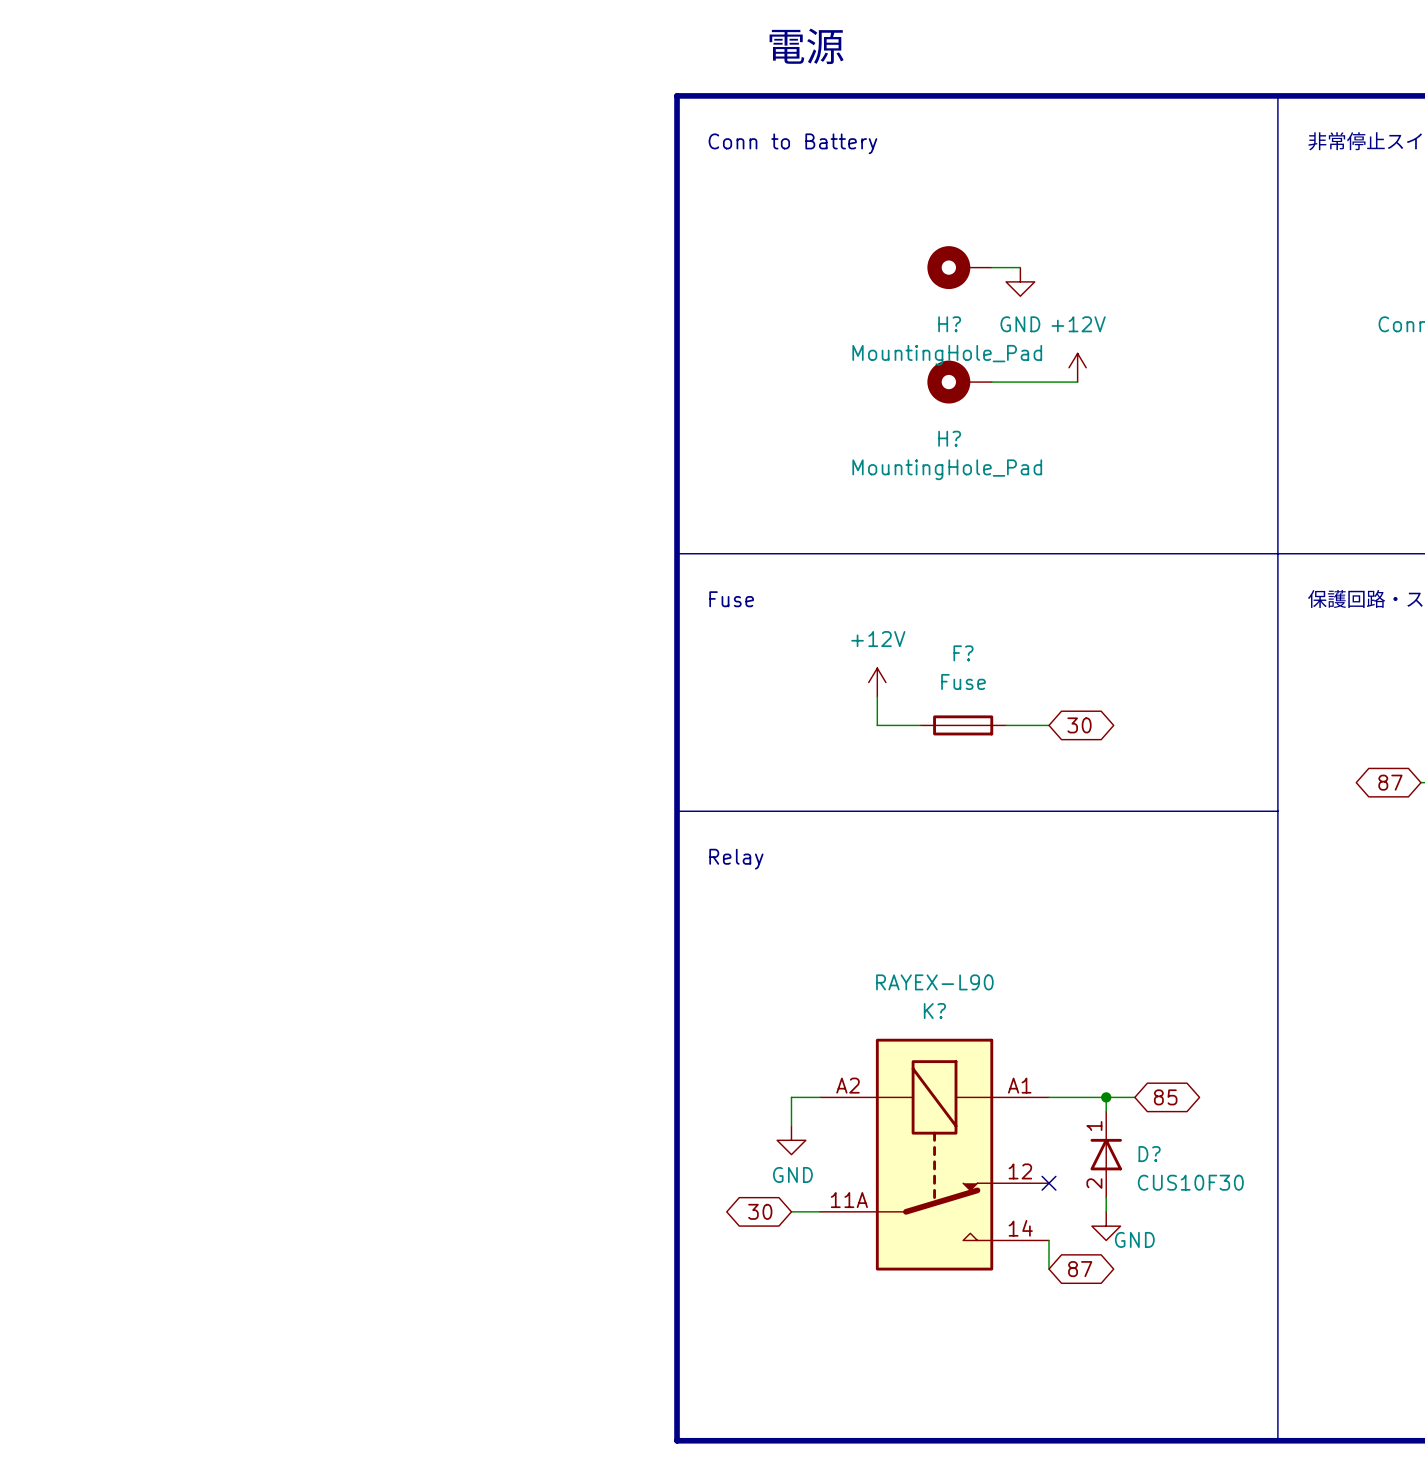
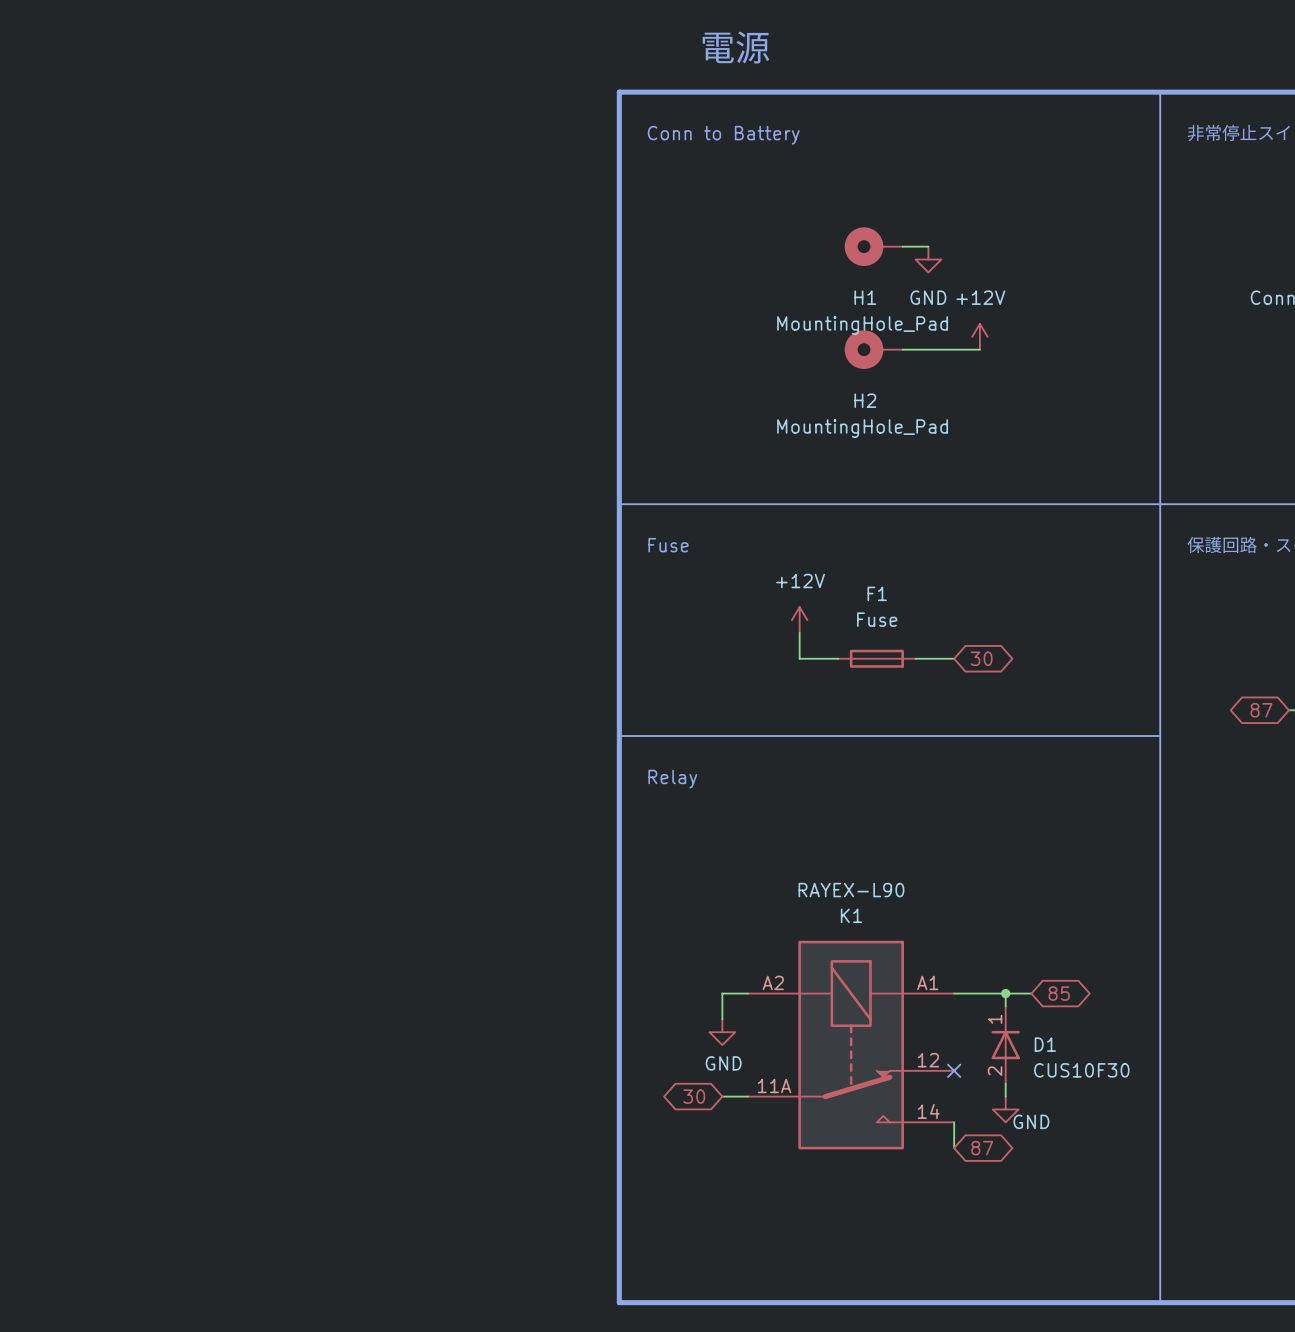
H? name: H? (949, 324) -> H1 (865, 297)
H? name: H? (949, 438) -> H2 (865, 400)
F? name: F? (963, 653) -> F1 (877, 593)
K? name: K? (934, 1011) -> K1 (851, 915)
D? name: D? (1149, 1154) -> D1 (1045, 1044)

